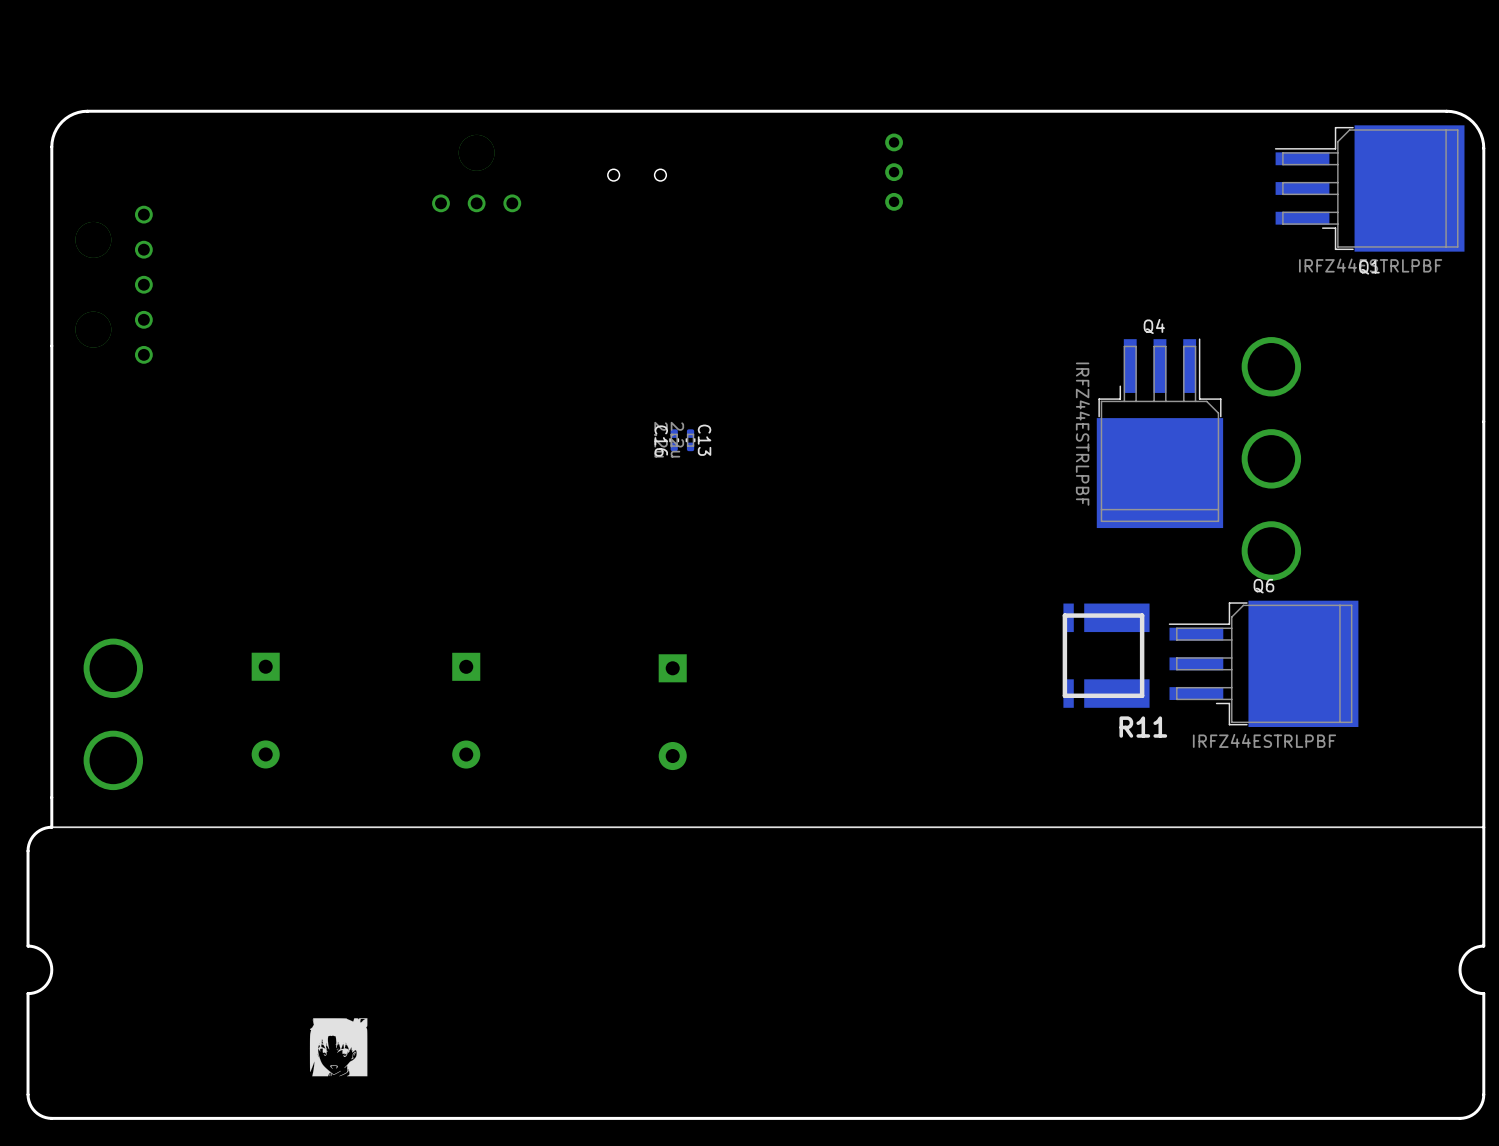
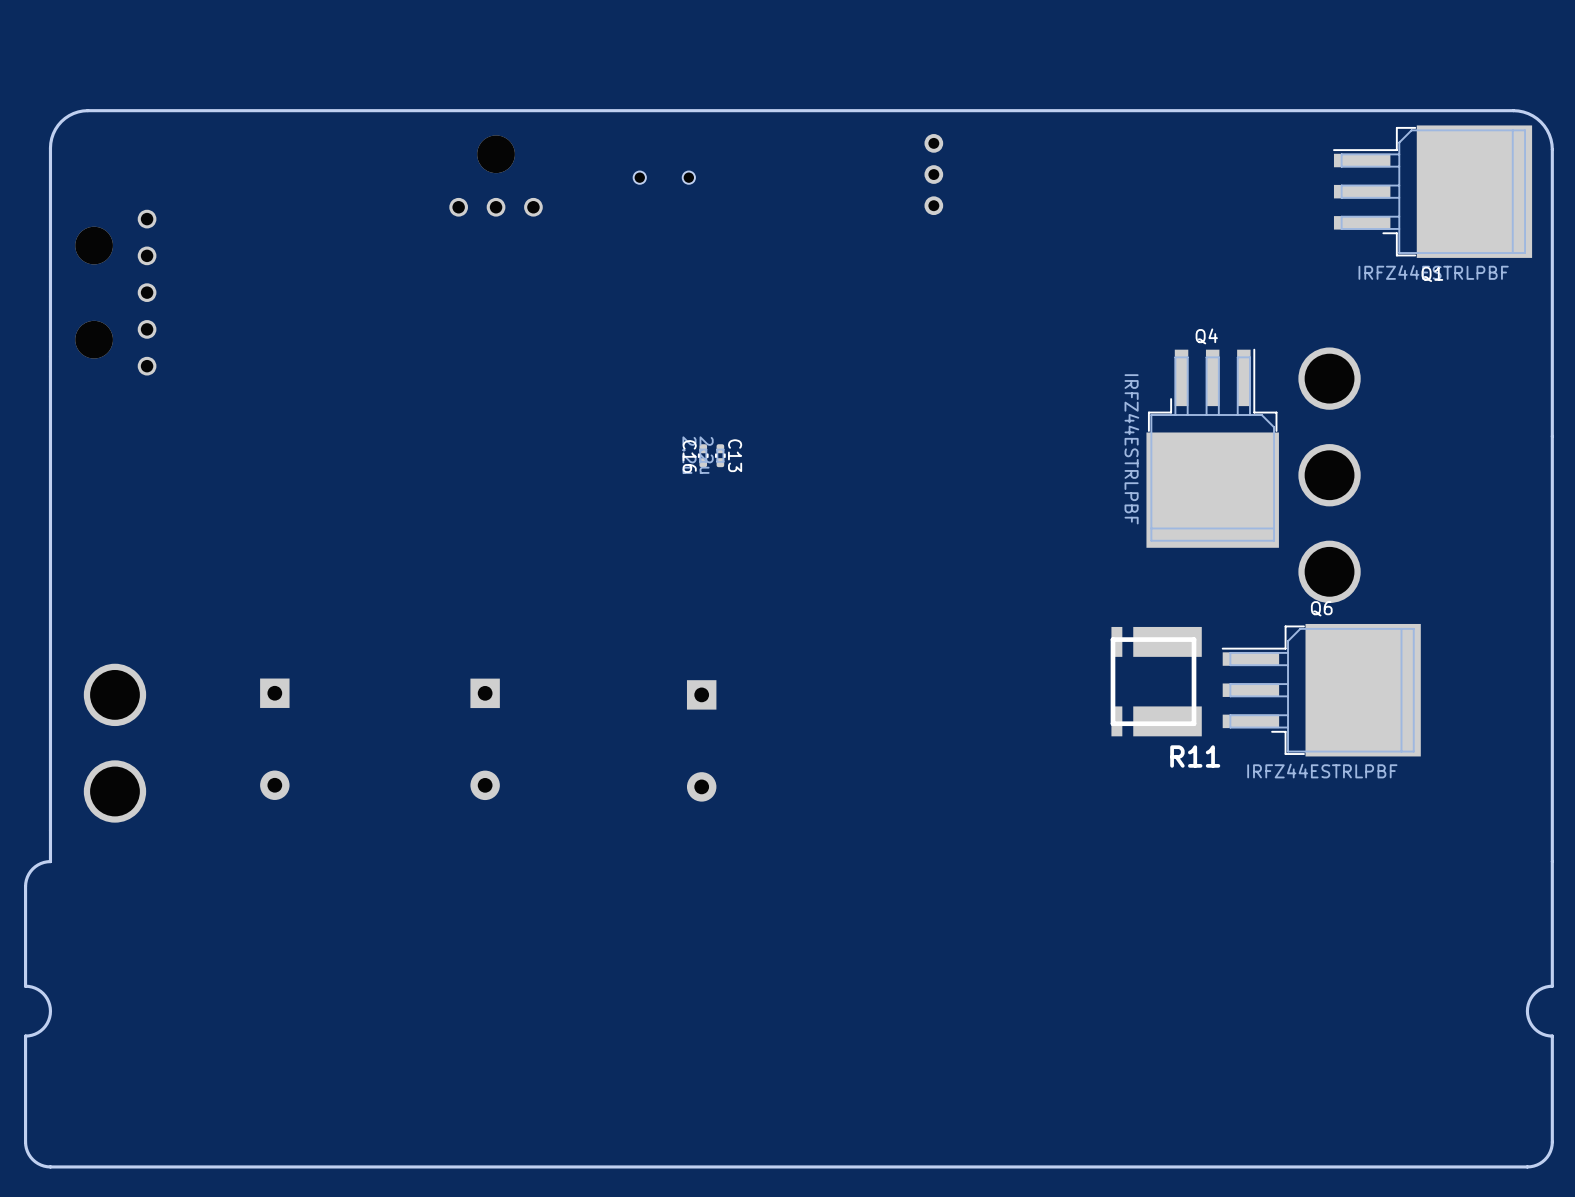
line: (1483, 827) (51, 827) -> none
drawing: [309, 1018, 368, 1077] -> none

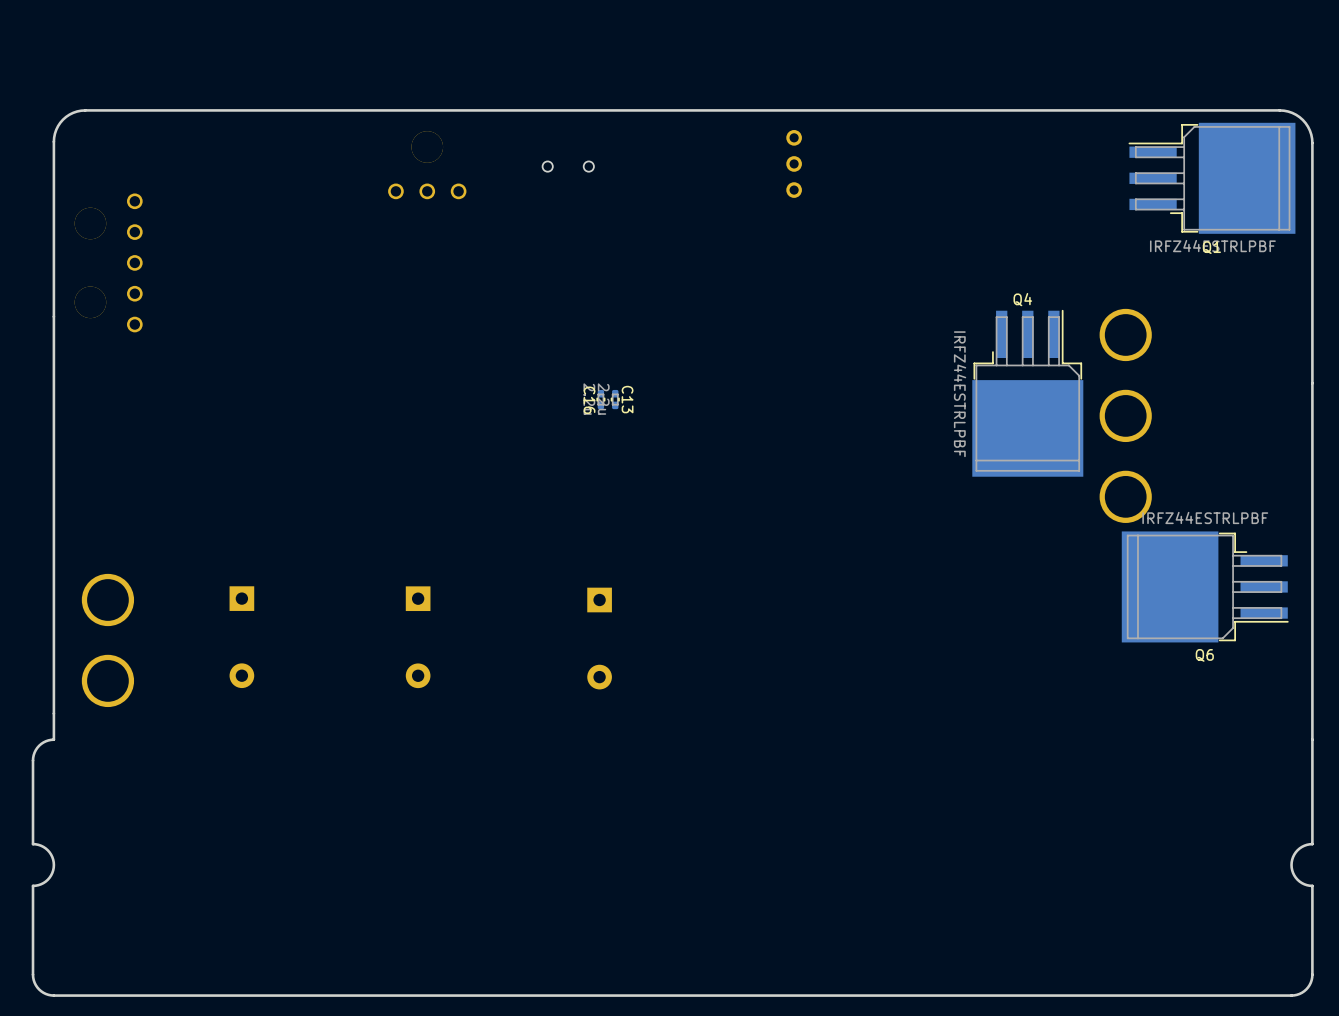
R11: (1156, 681) -> none
Q6 rotation: 0° (1321, 690) -> 180° (1205, 586)

